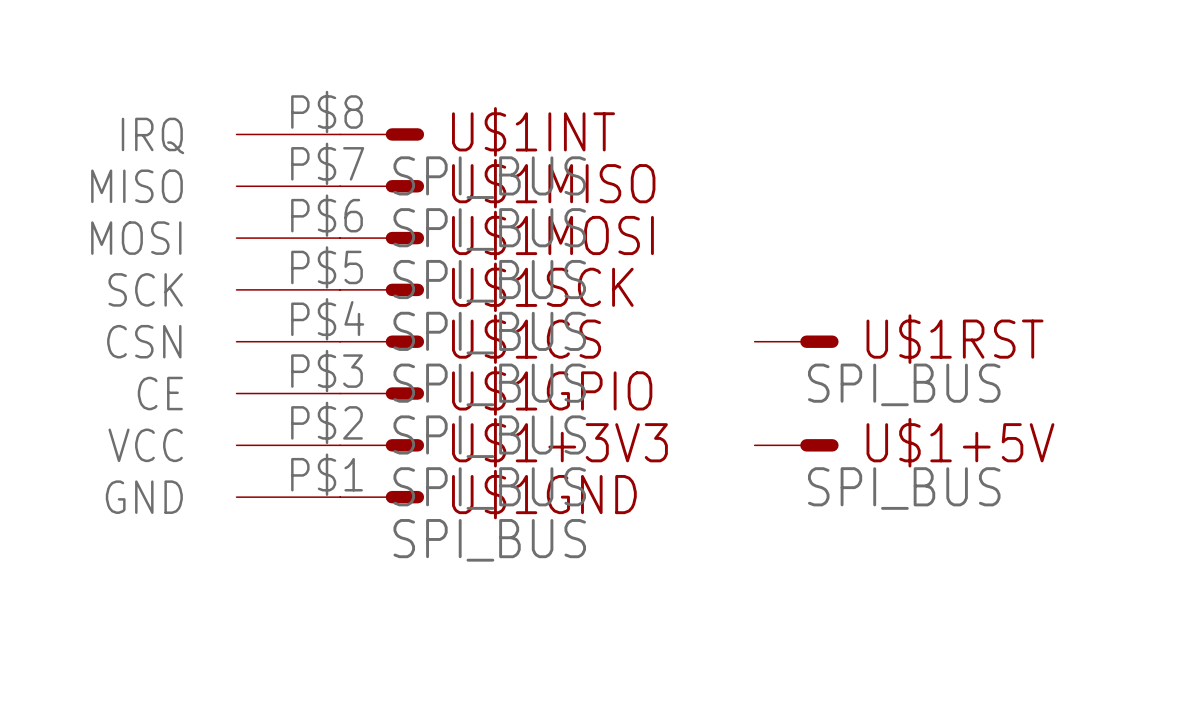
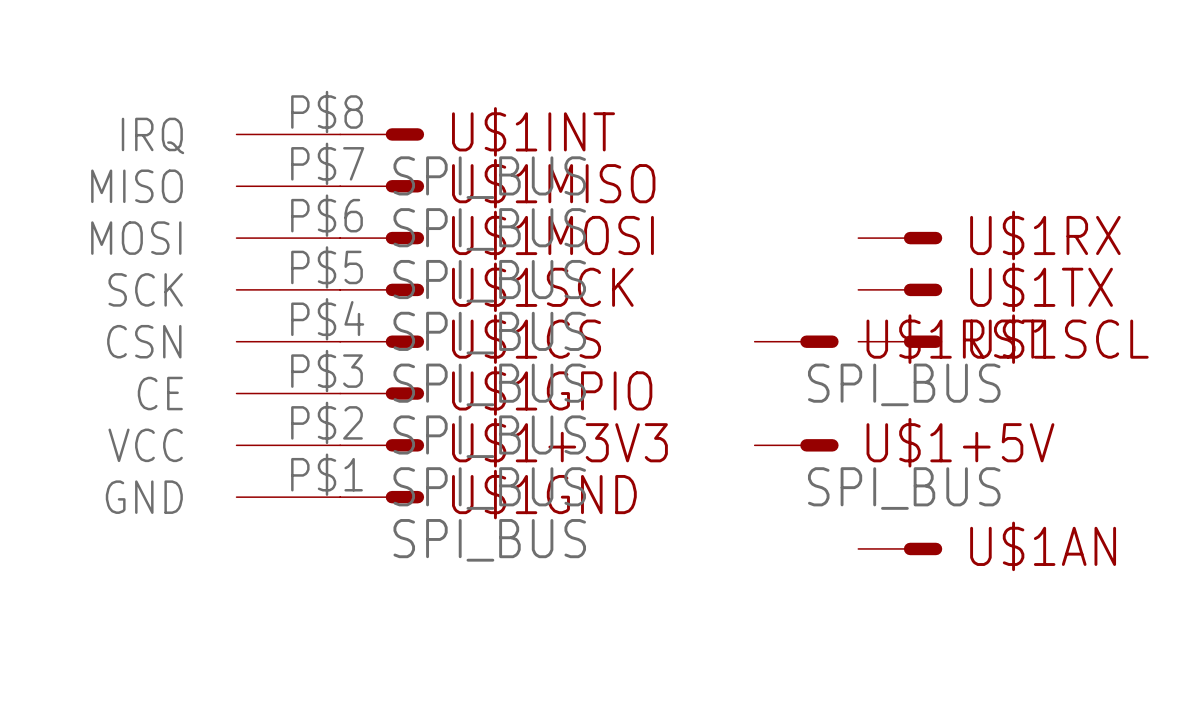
U$1RX: none -> (900, 238)
U$1TX: none -> (900, 289)
U$1SCL: none -> (900, 341)
U$1AN: none -> (900, 548)

